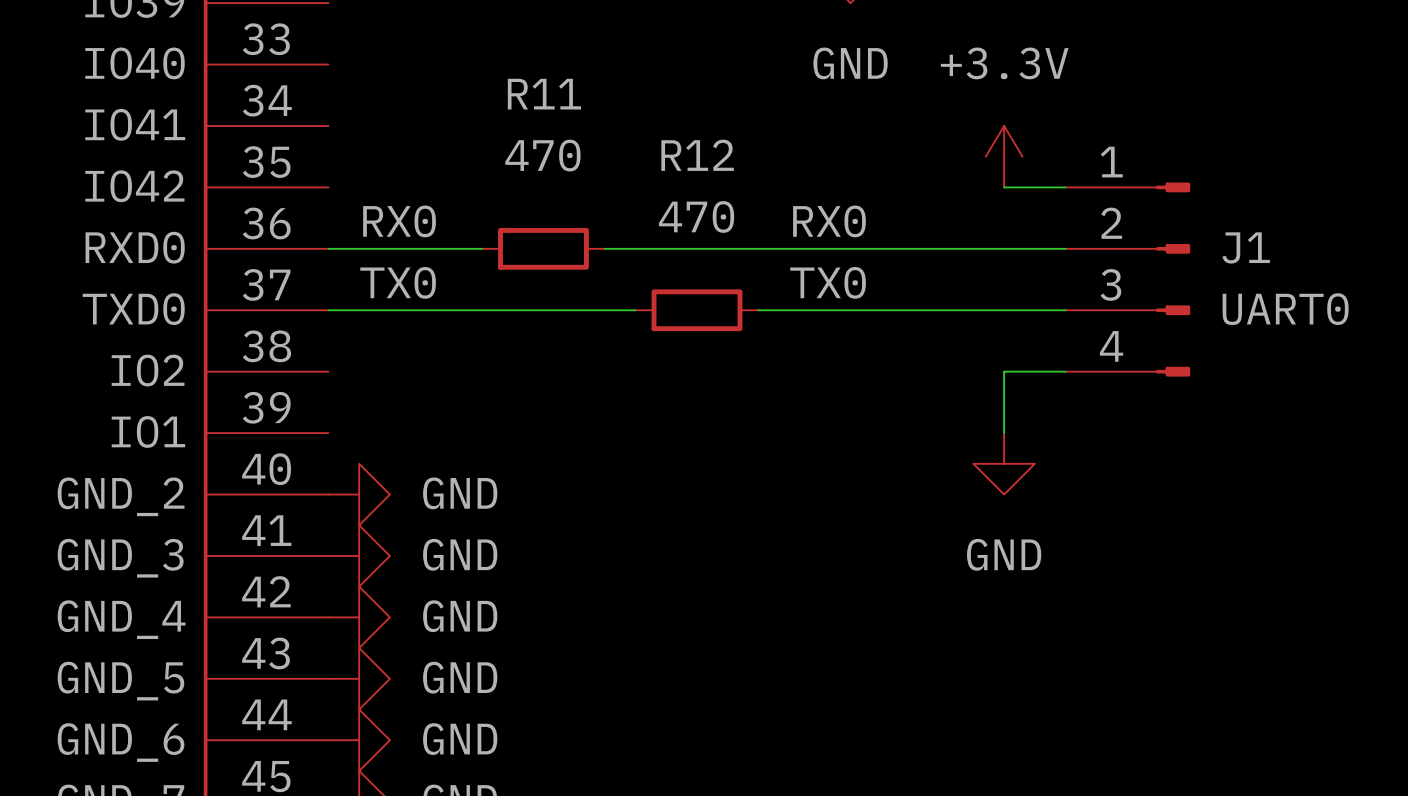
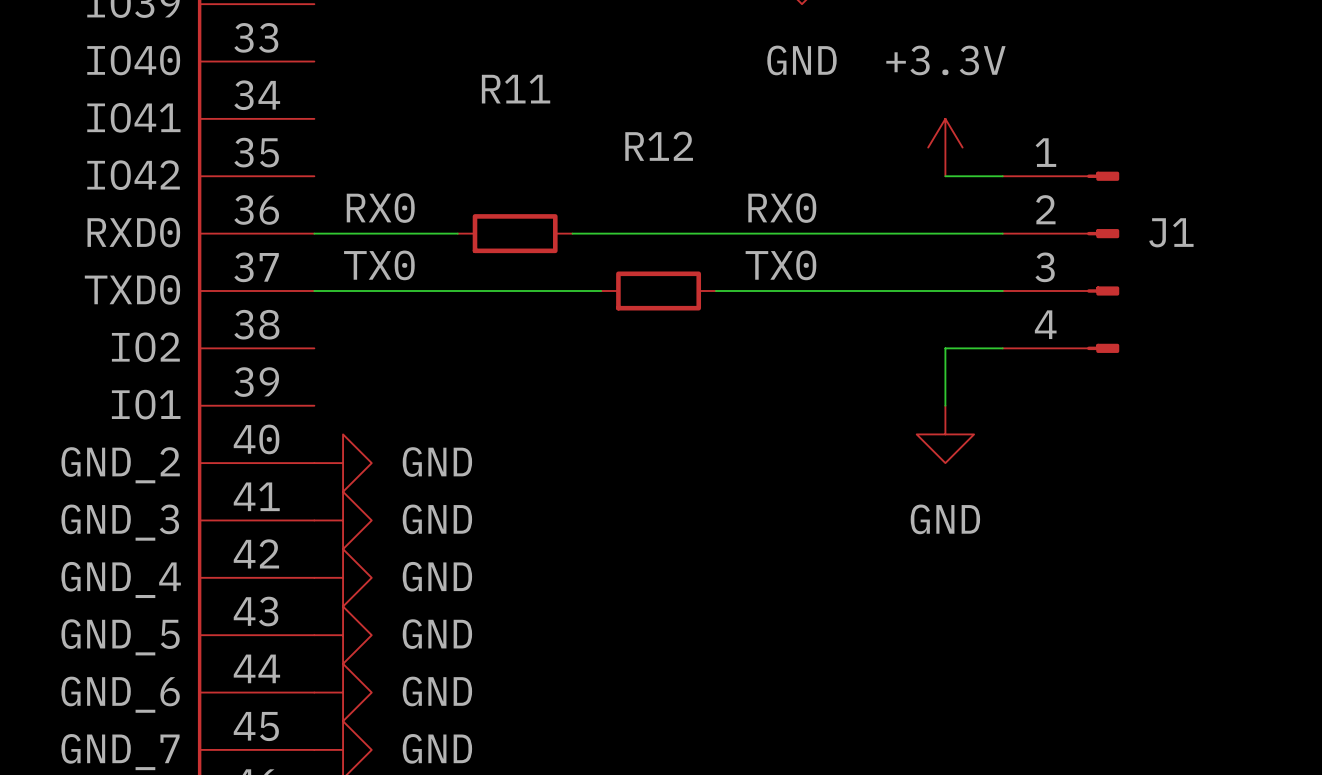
R11 value: 470 (542, 155) -> none
R12 value: 470 (696, 216) -> none
J1 value: UART0 (1285, 309) -> none

